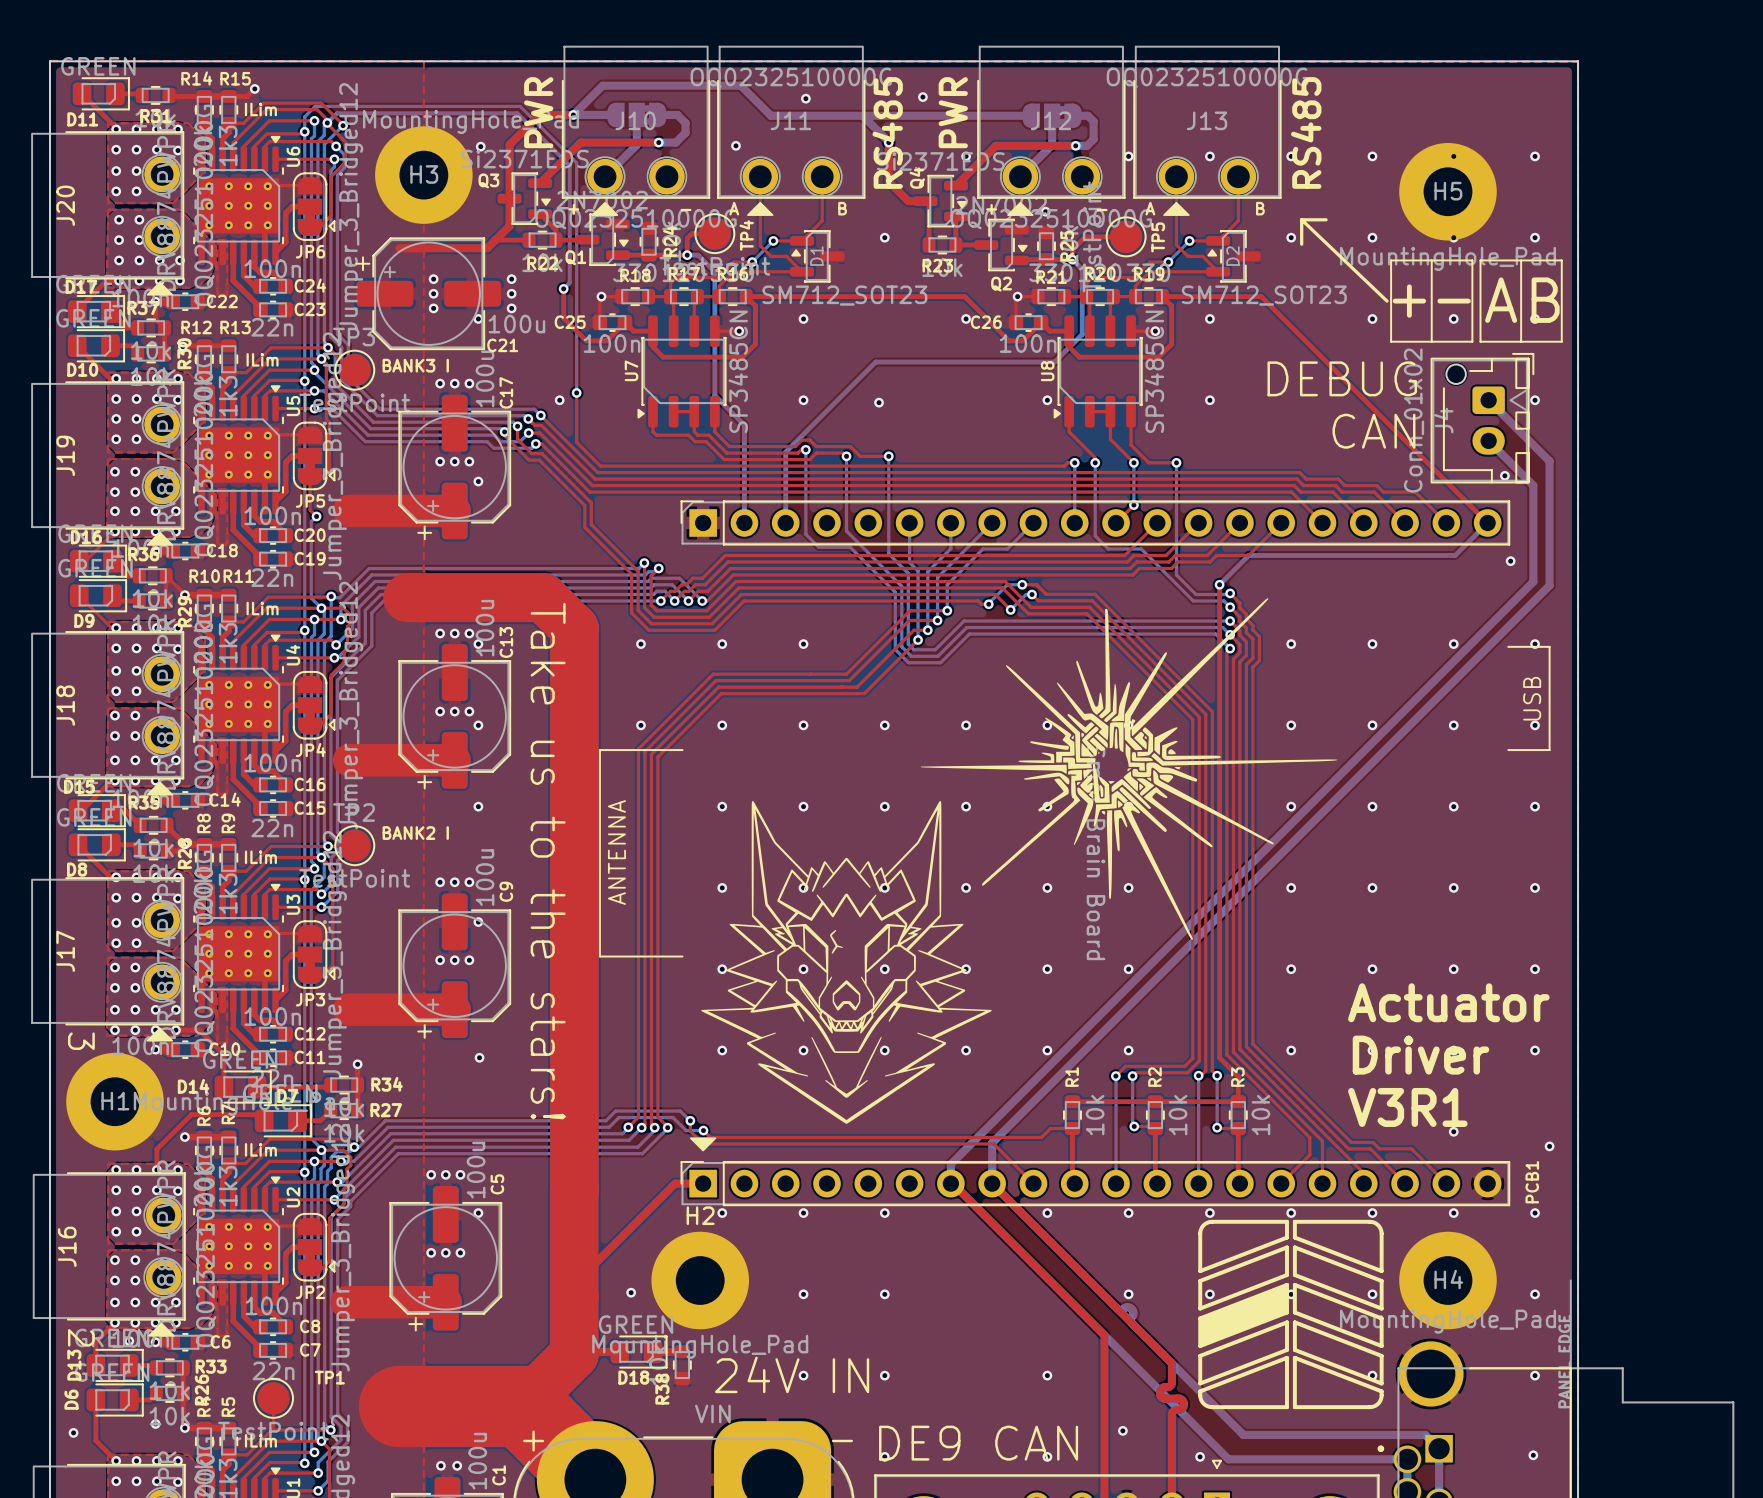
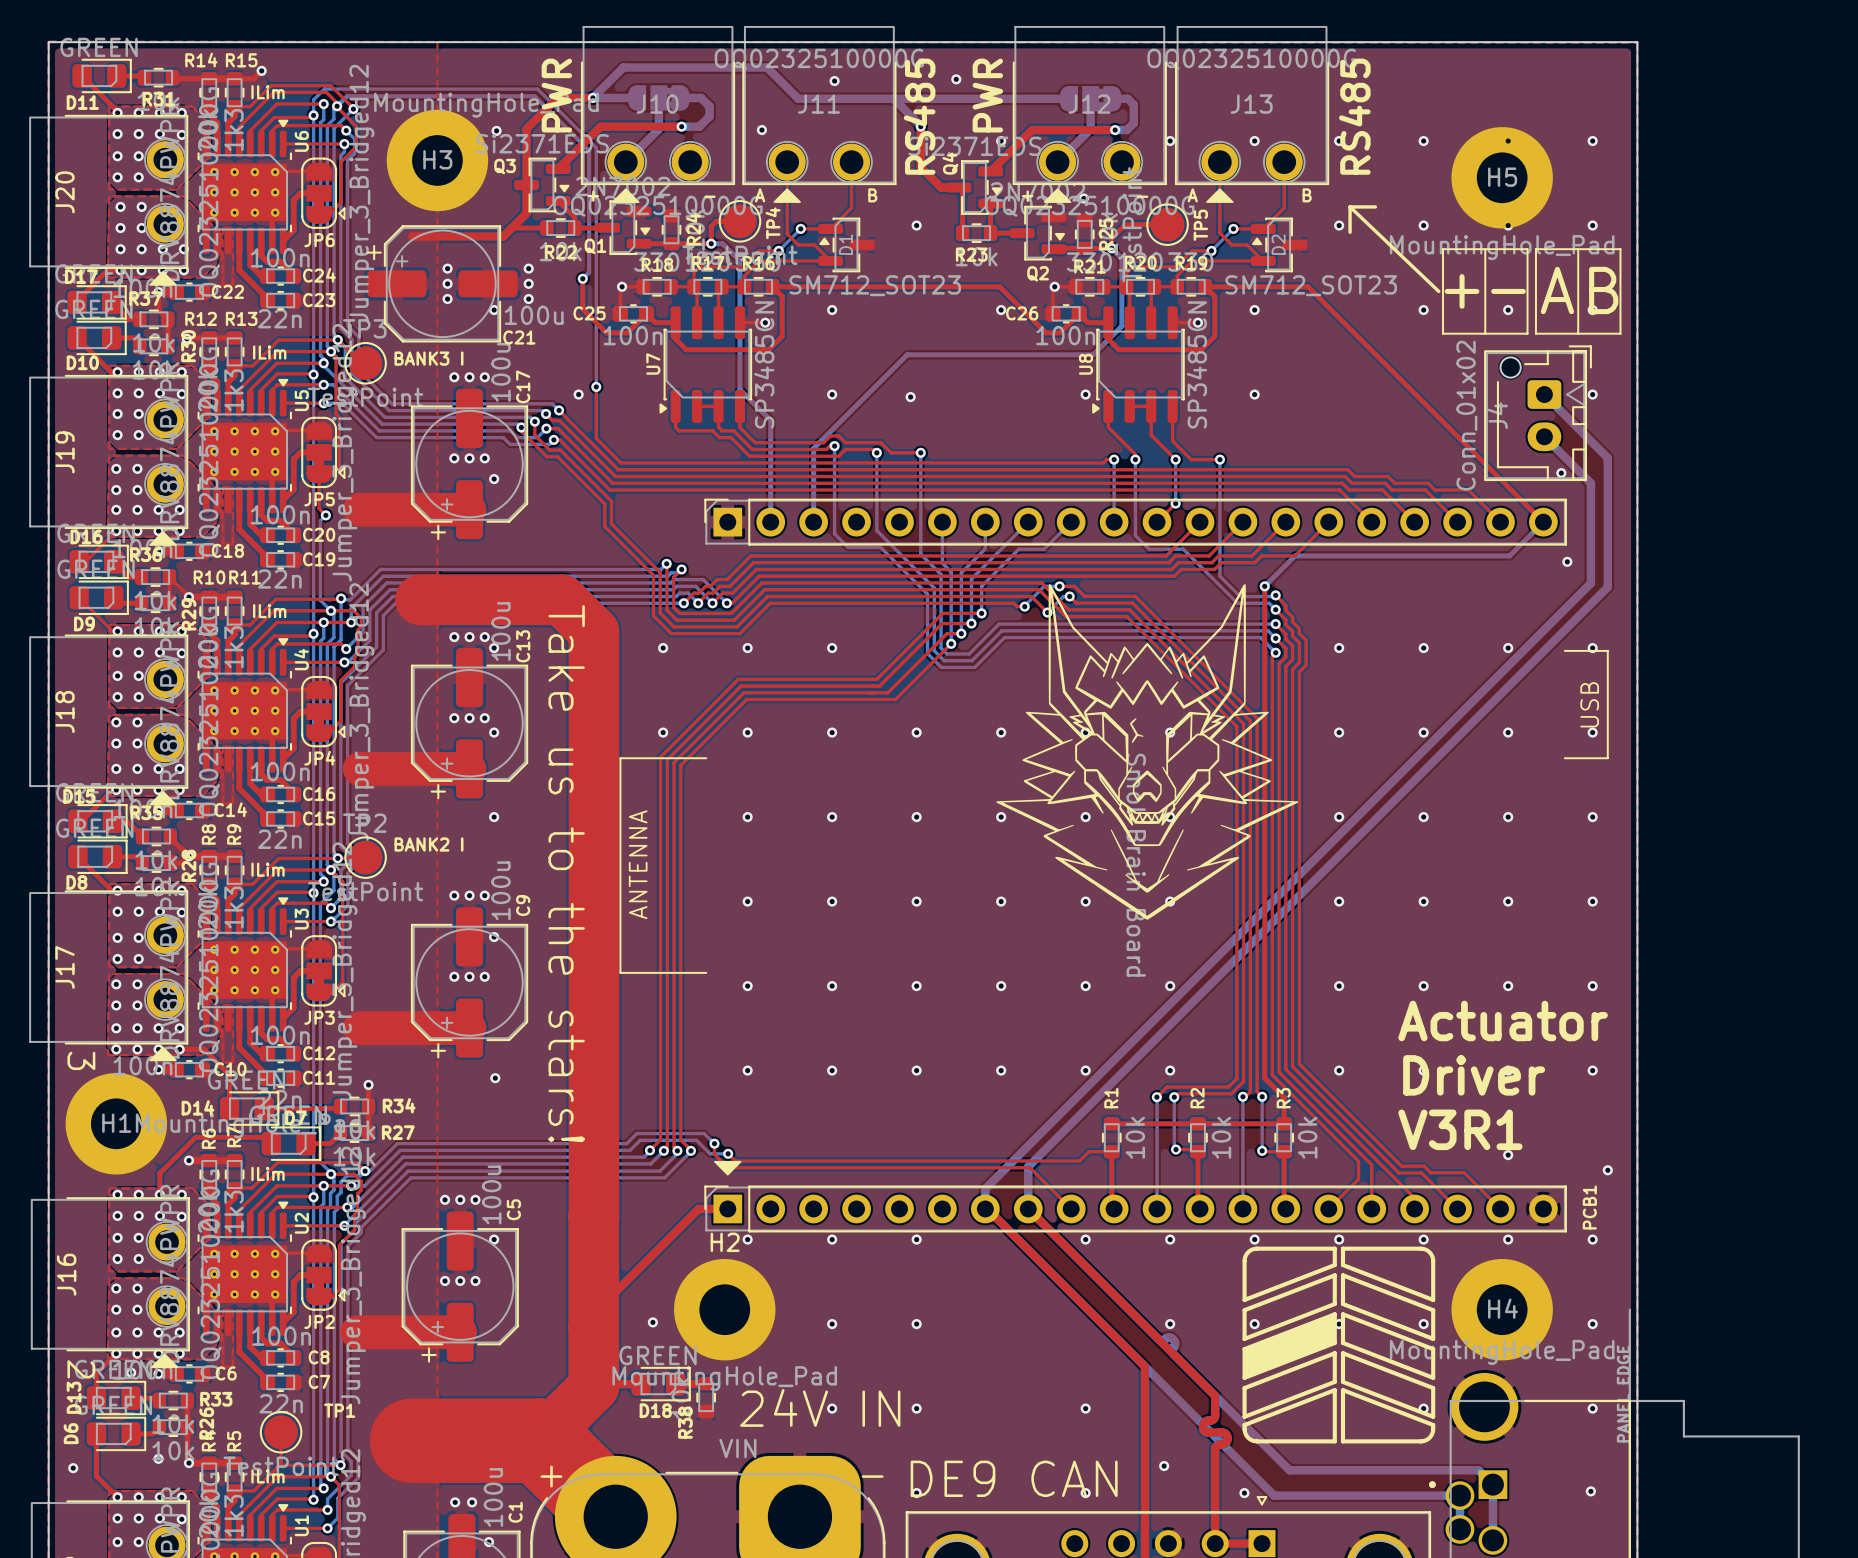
text: DEBUG (1342, 378) -> none
text: CAN (1373, 431) -> none
drawing: [920, 598, 1338, 940] -> none
drawing position: (846, 962) -> (1147, 751)

